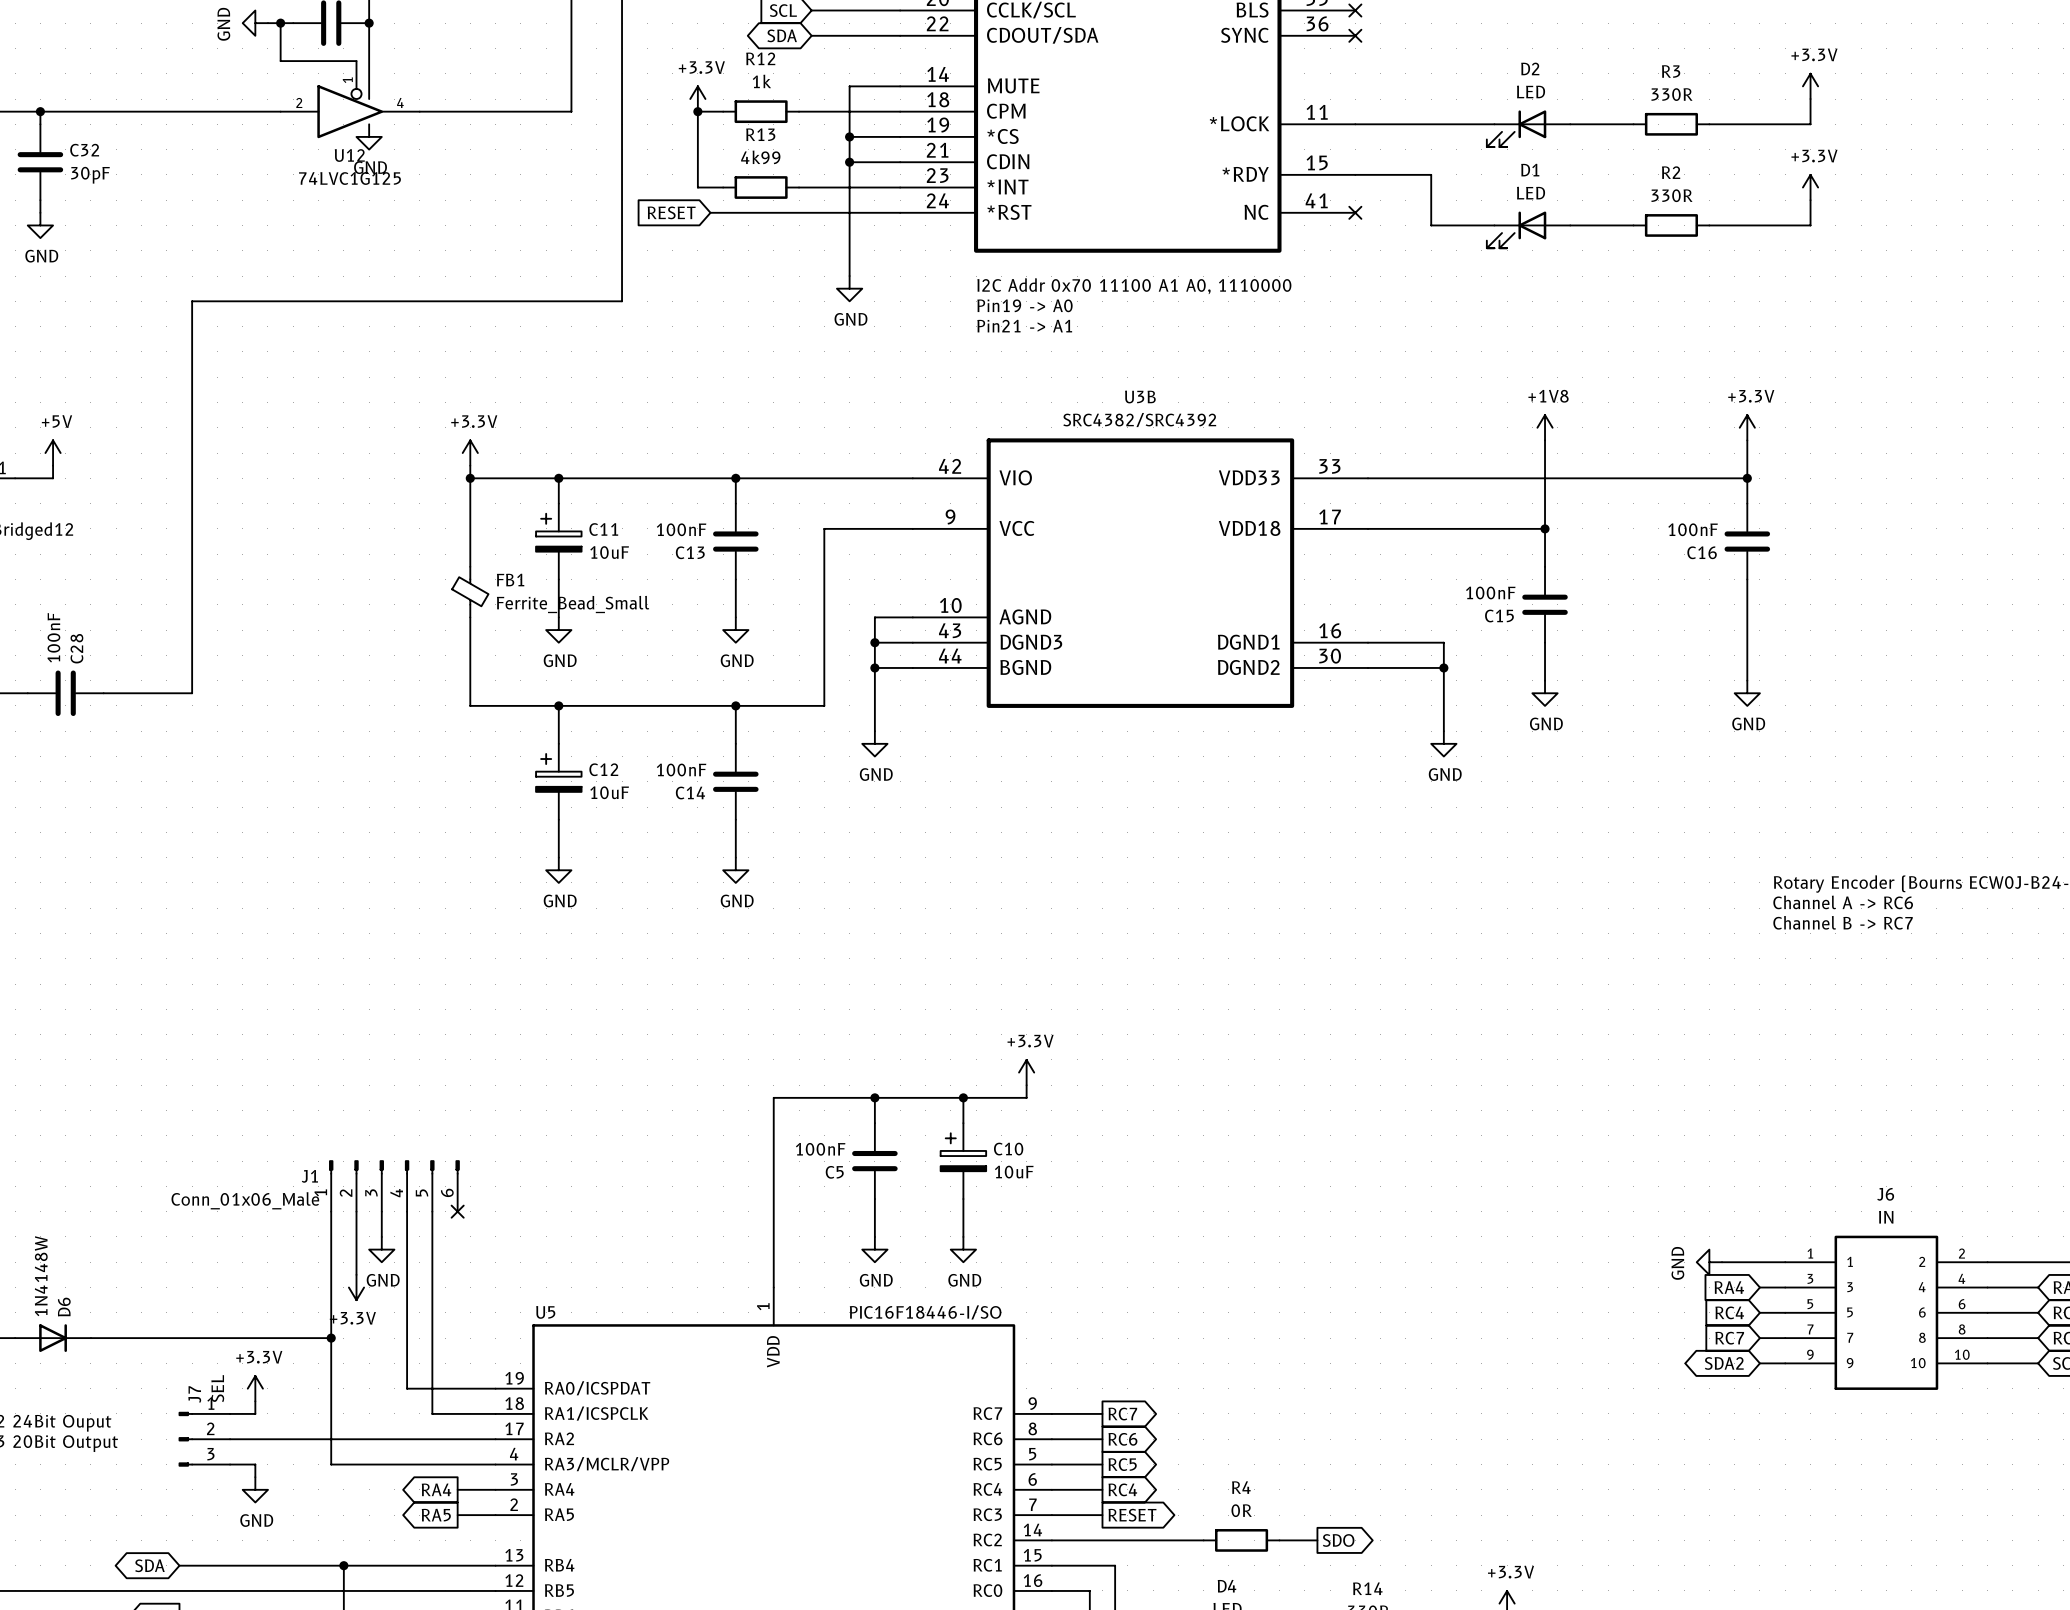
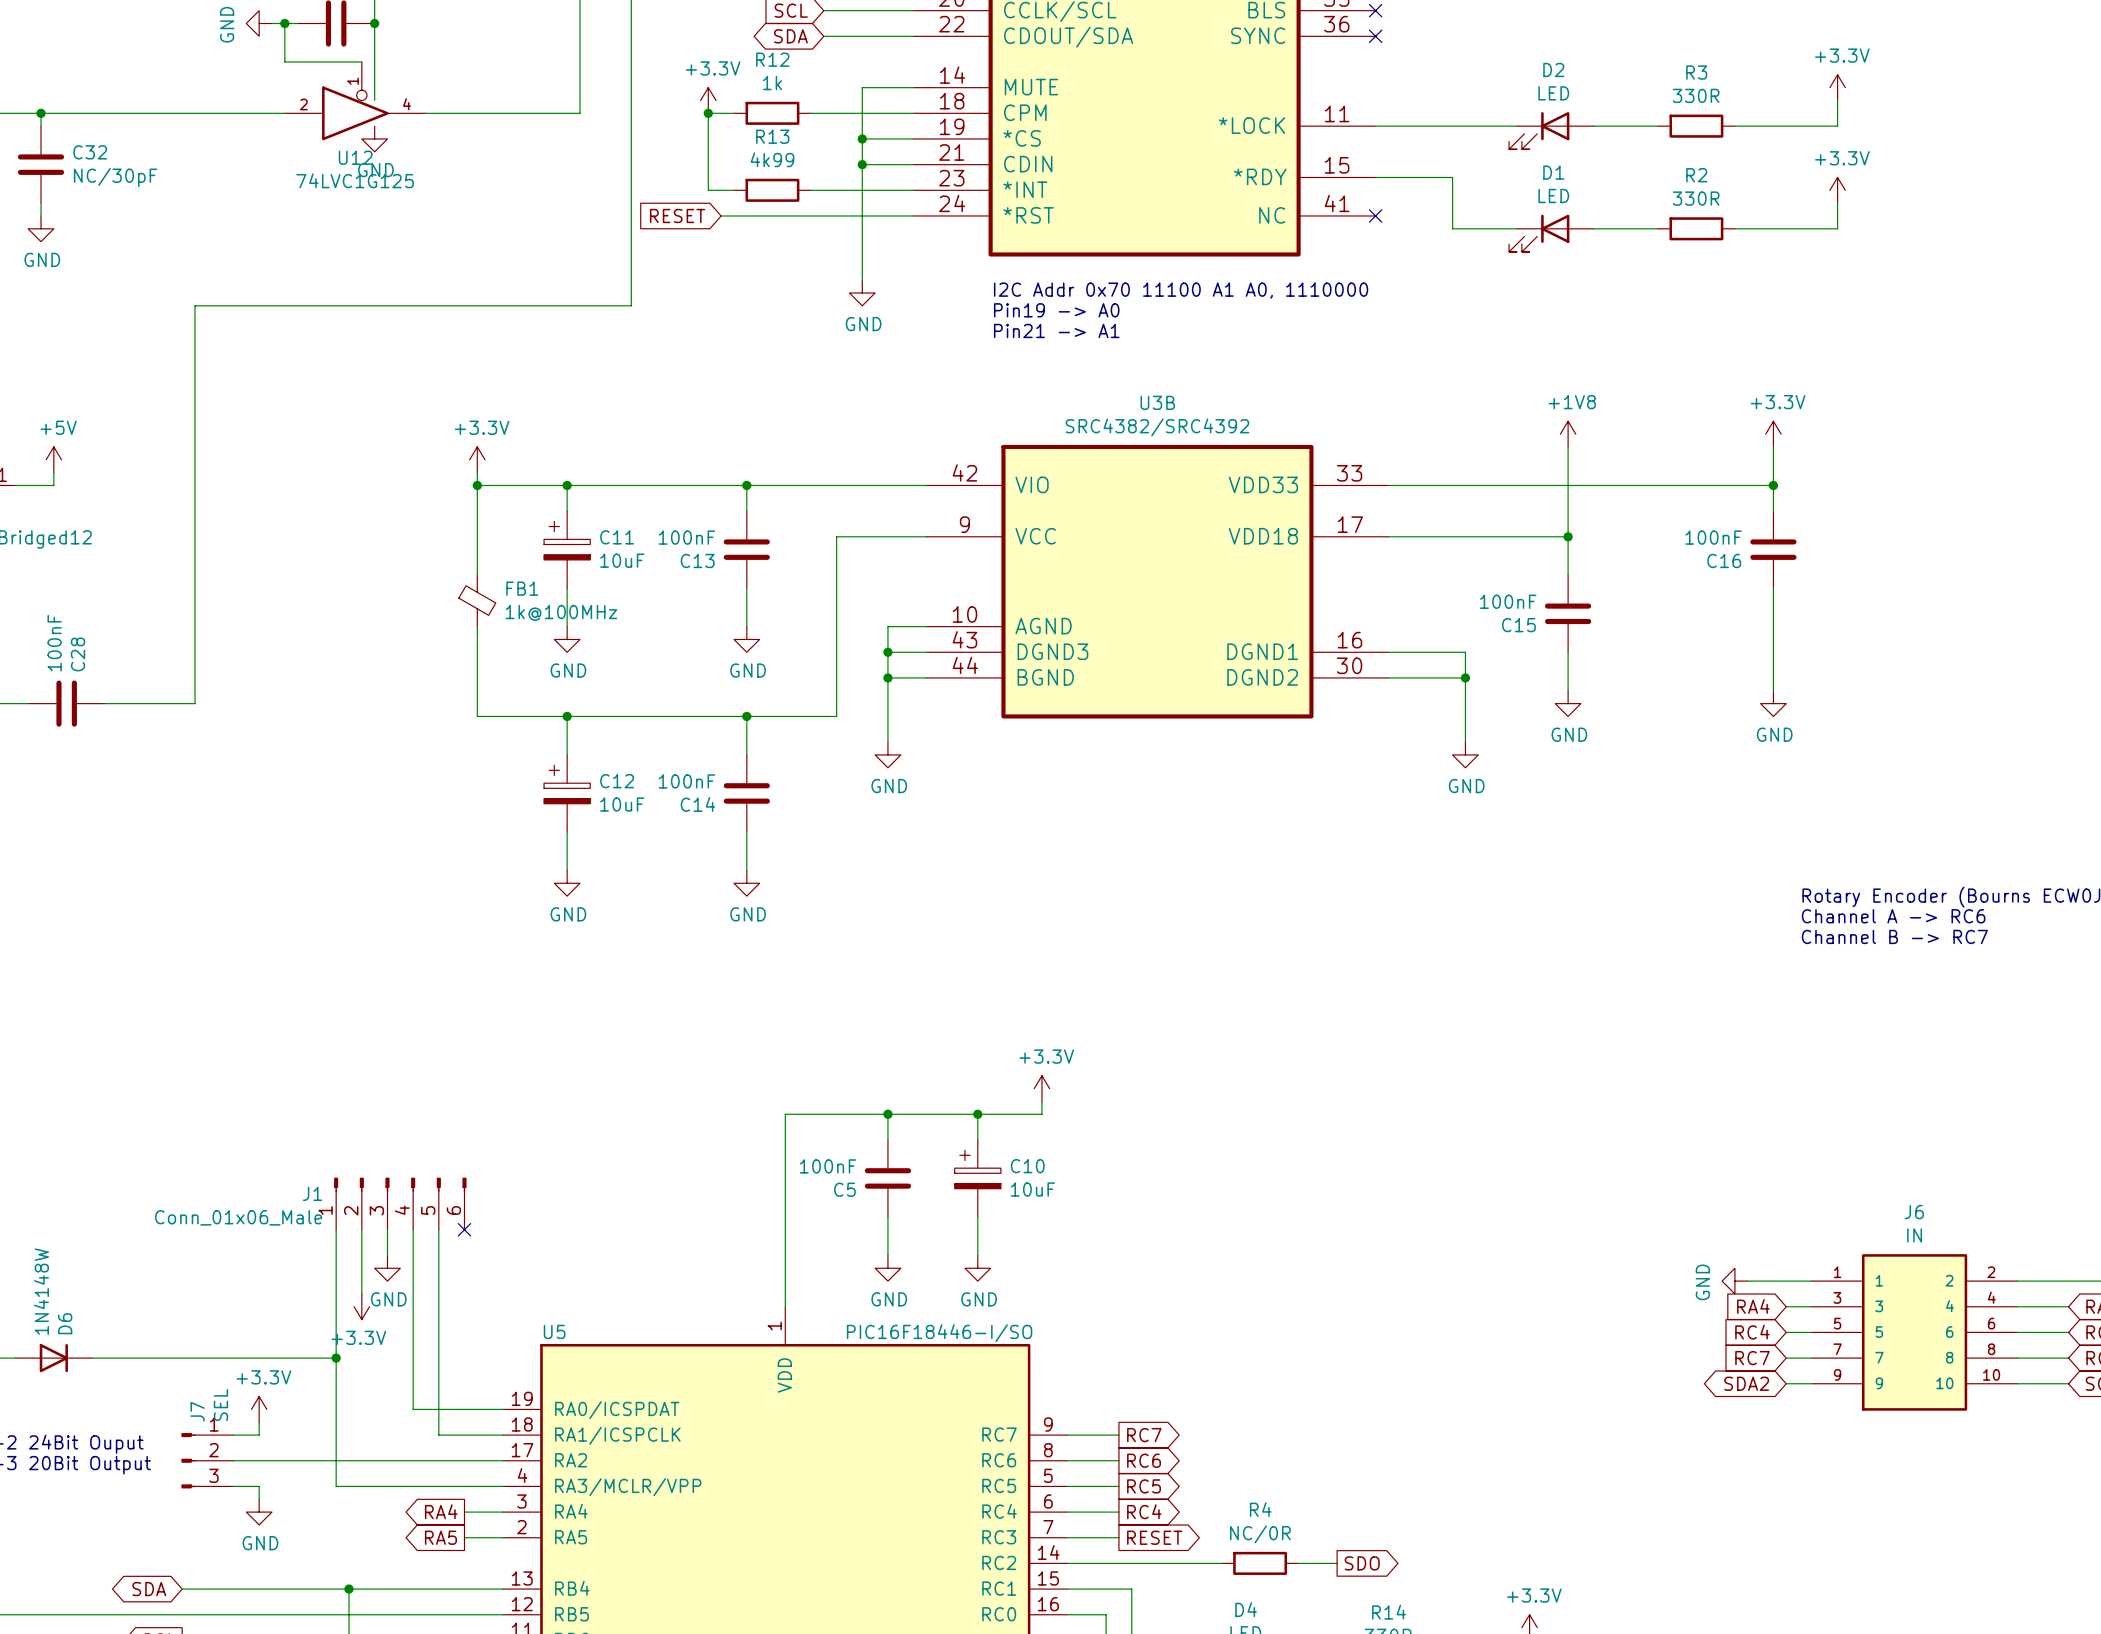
C32 value: 30pF (90, 175) -> NC/30pF (115, 177)
FB1 value: Ferrite_Bead_Small (573, 604) -> 1k@100MHz (561, 612)
R4 value: 0R (1241, 1510) -> NC/0R (1260, 1534)

